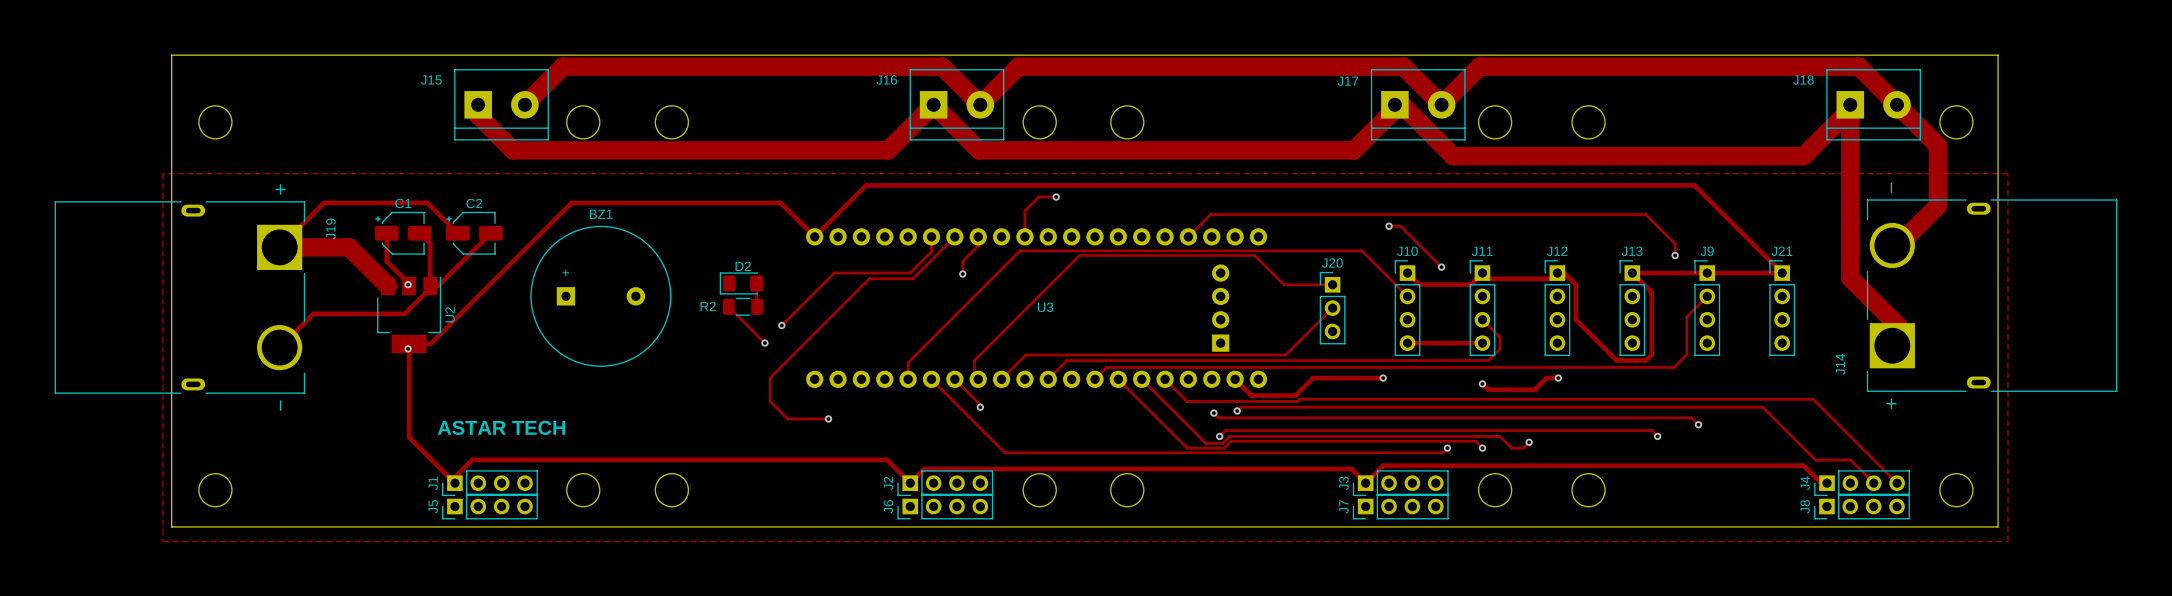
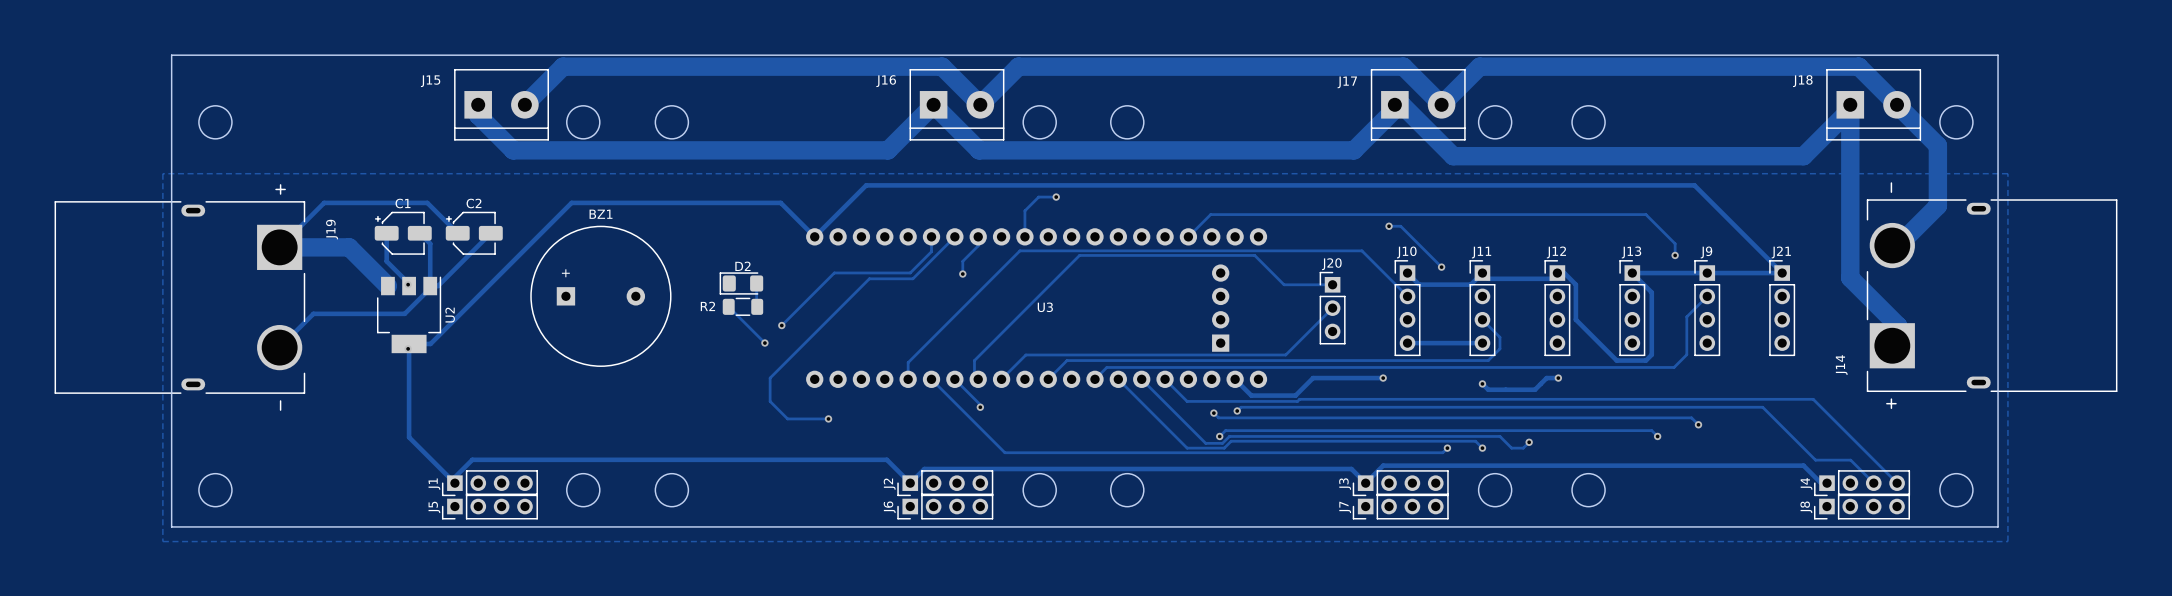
text: ASTAR TECH (501, 427) -> none

